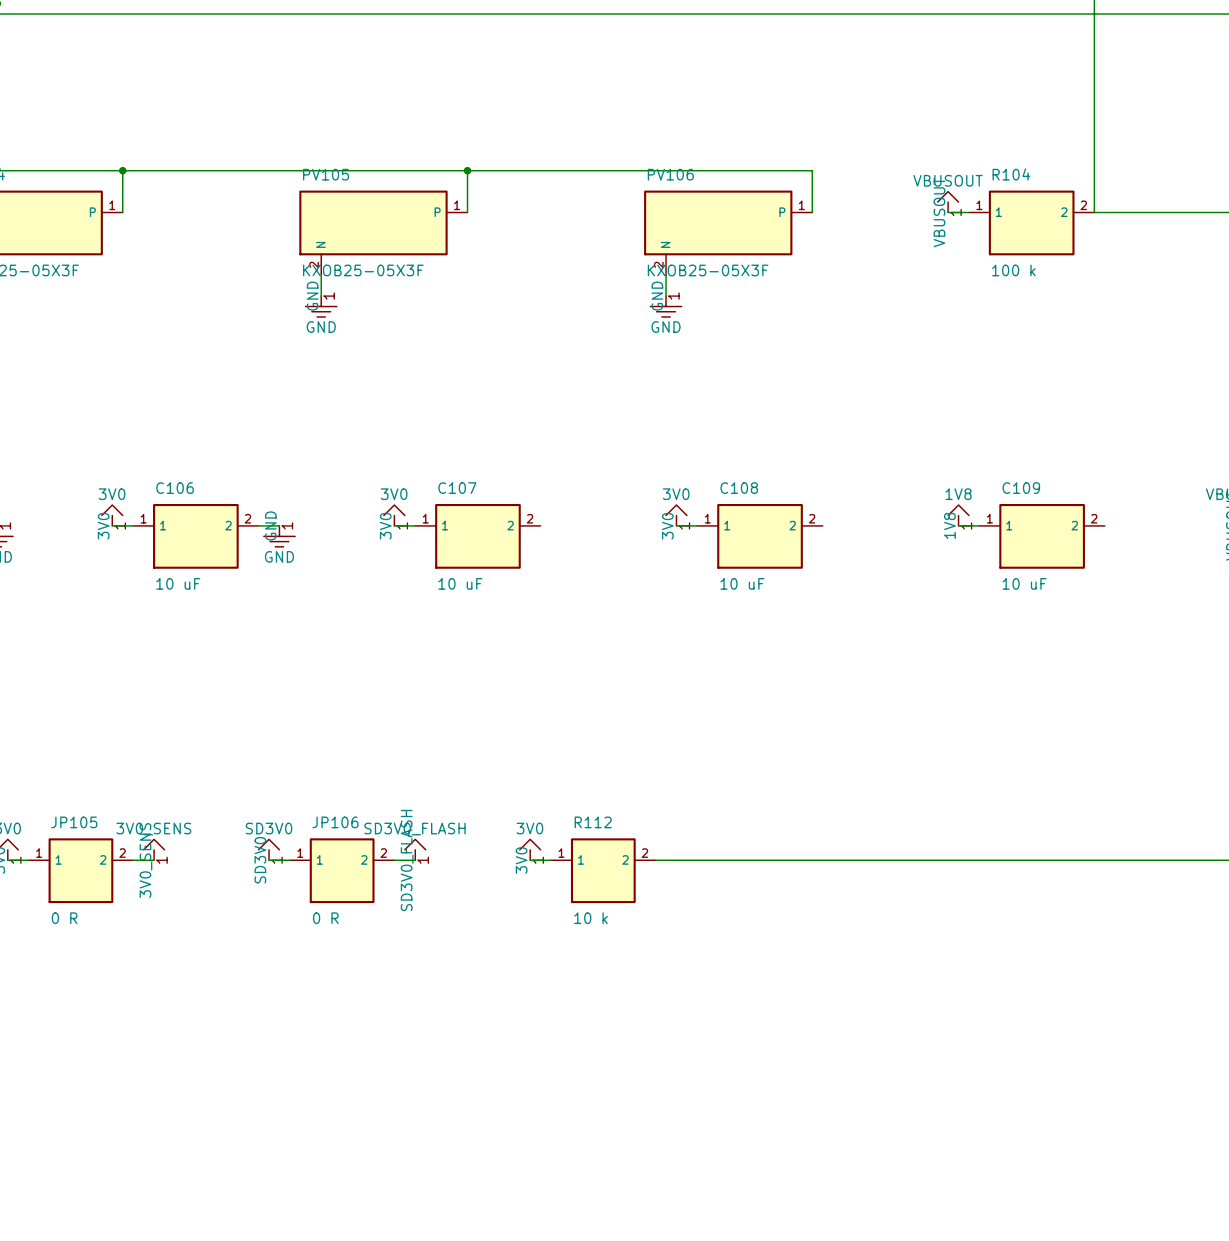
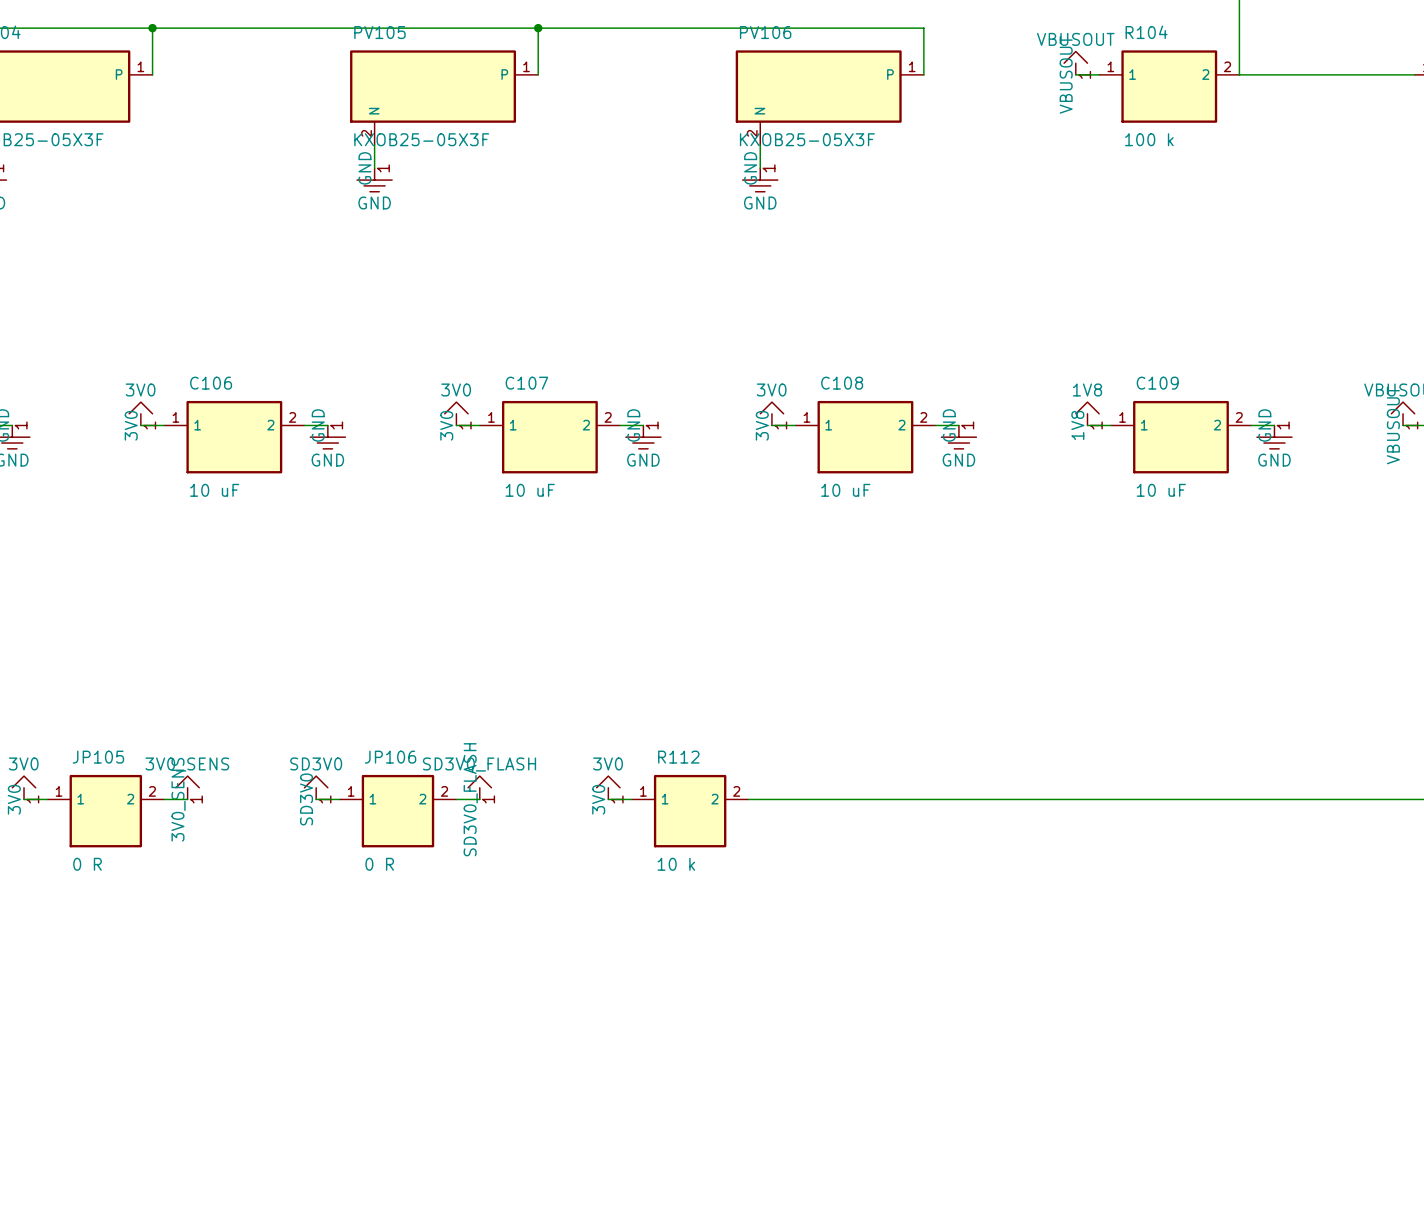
wire: none -> (620, 425) (643, 425)
wire: none -> (935, 425) (958, 425)
wire: none -> (1251, 425) (1274, 425)
power symbol: none -> GND (643, 437)
power symbol: none -> GND (958, 437)
power symbol: none -> GND (1274, 437)

